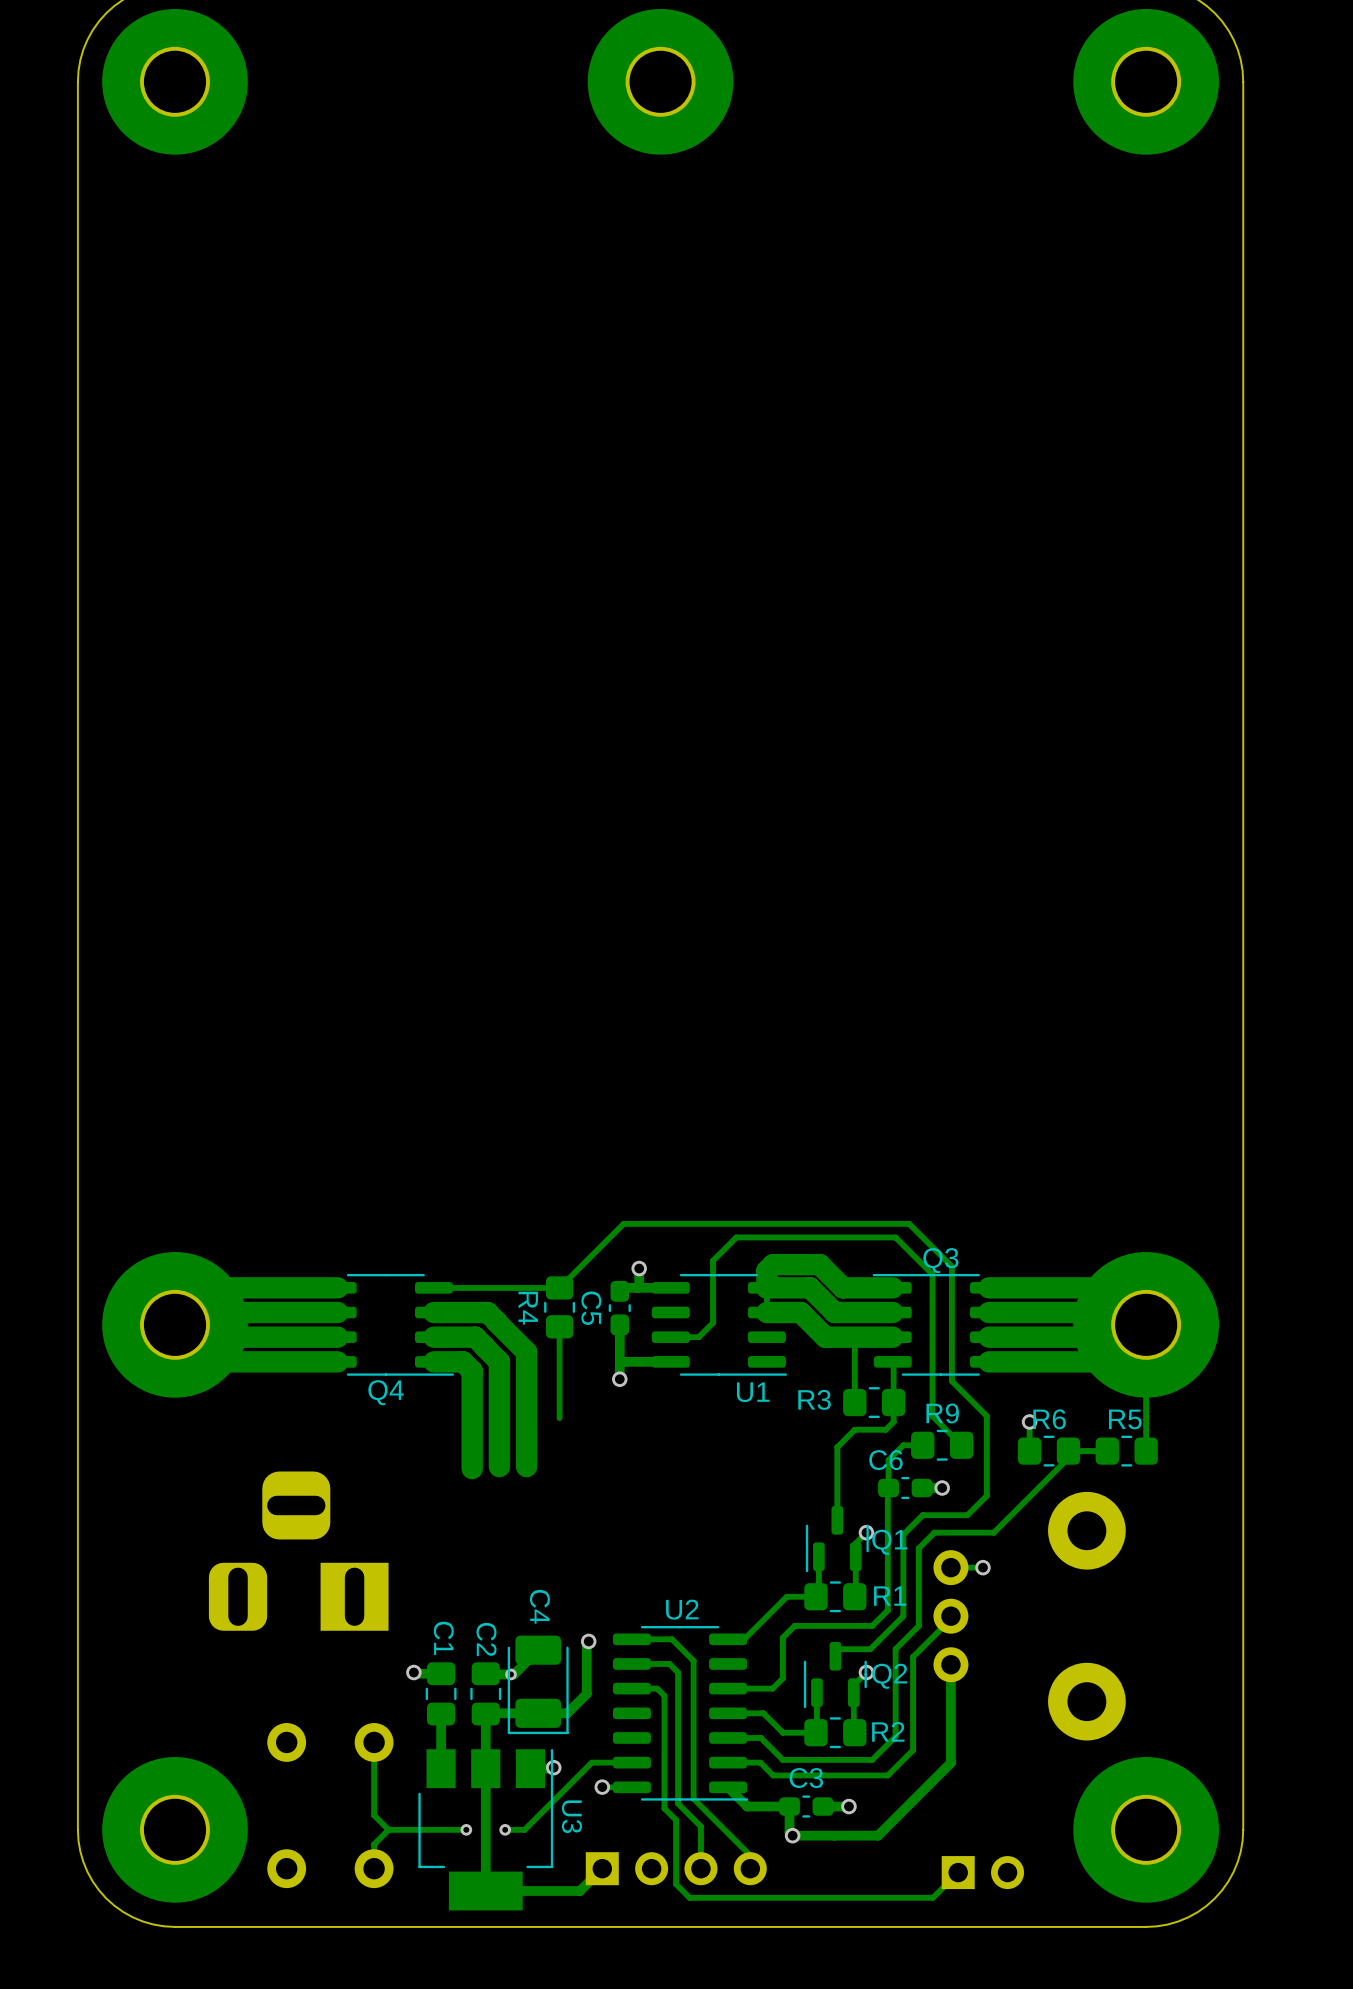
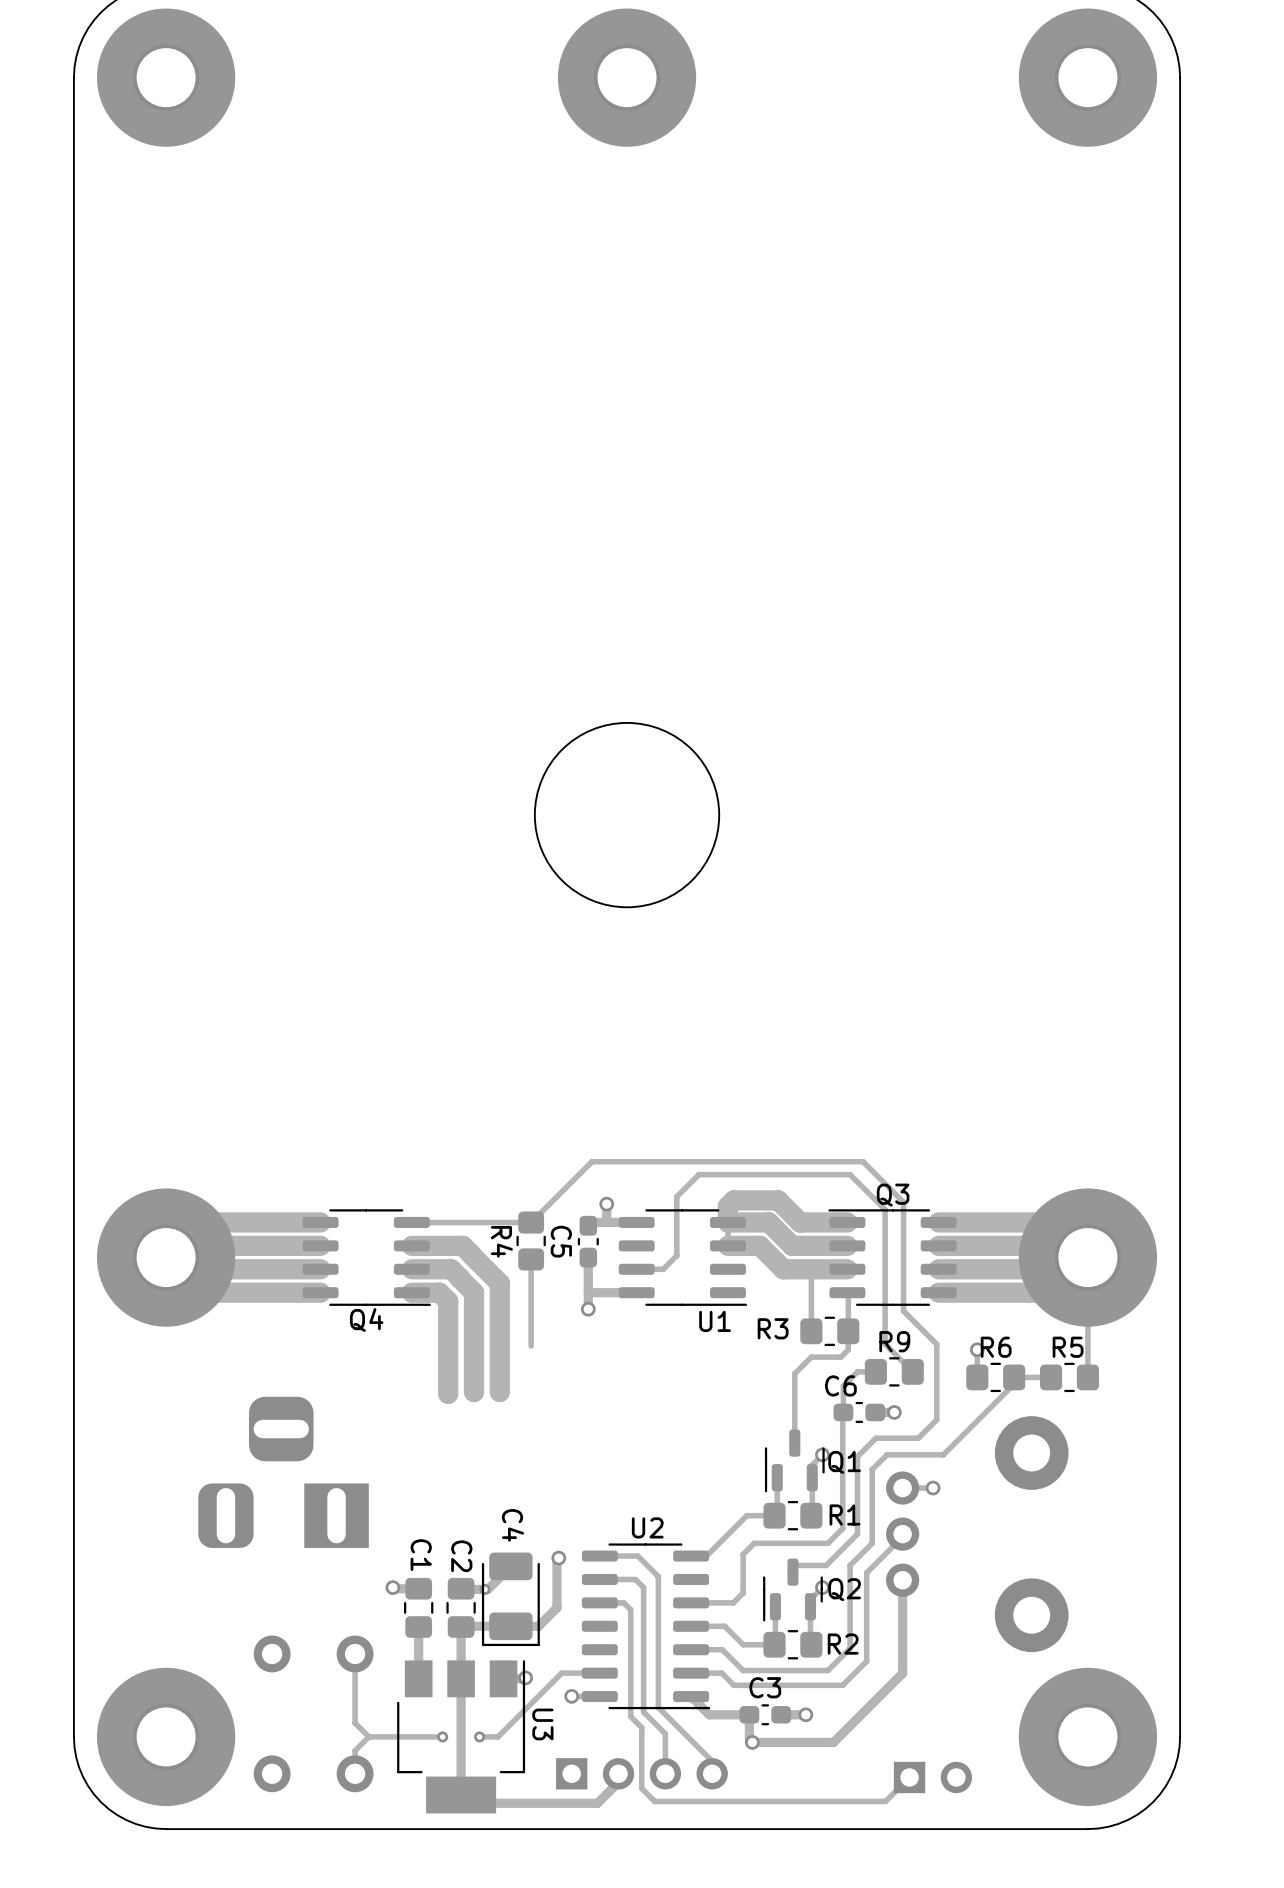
round board edge: none -> [533, 722, 721, 909]
track: (602, 1868) (579, 1891) (485, 1891) -> (618, 1773) (618, 1782) (597, 1803) (469, 1803) (461, 1795)

